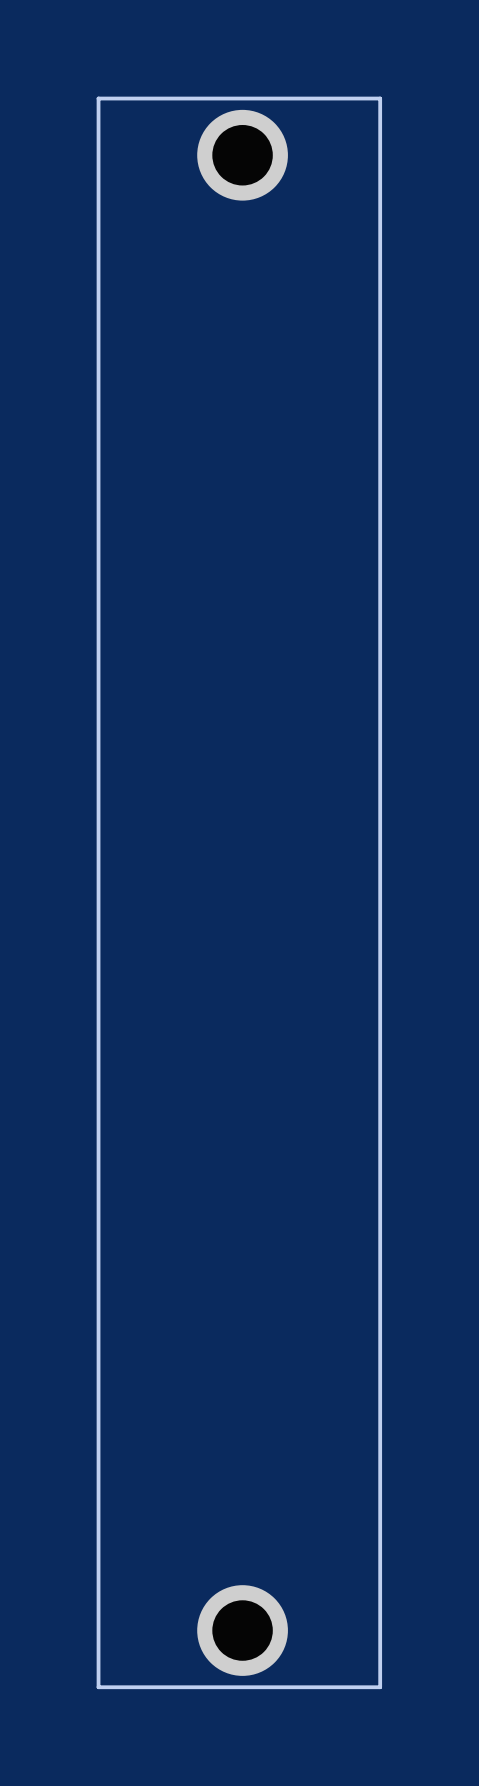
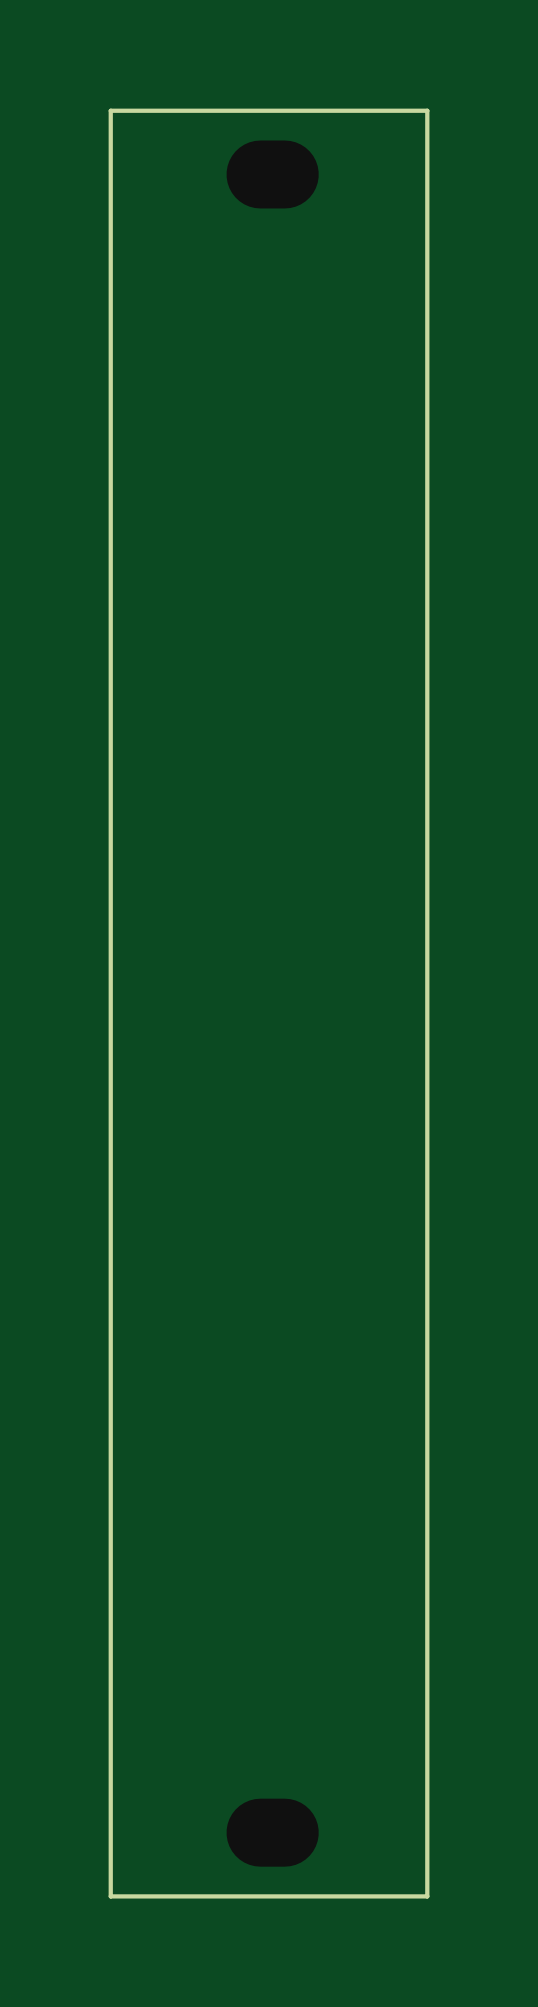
part footprint: [197, 109, 288, 201] -> [226, 140, 319, 209]
part footprint: [197, 1585, 288, 1676] -> [226, 1798, 319, 1867]

